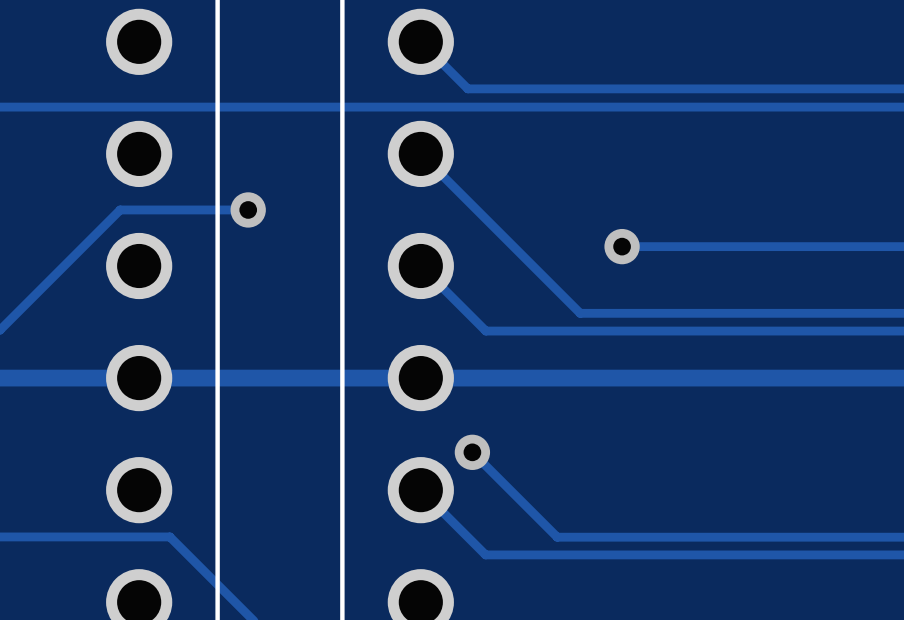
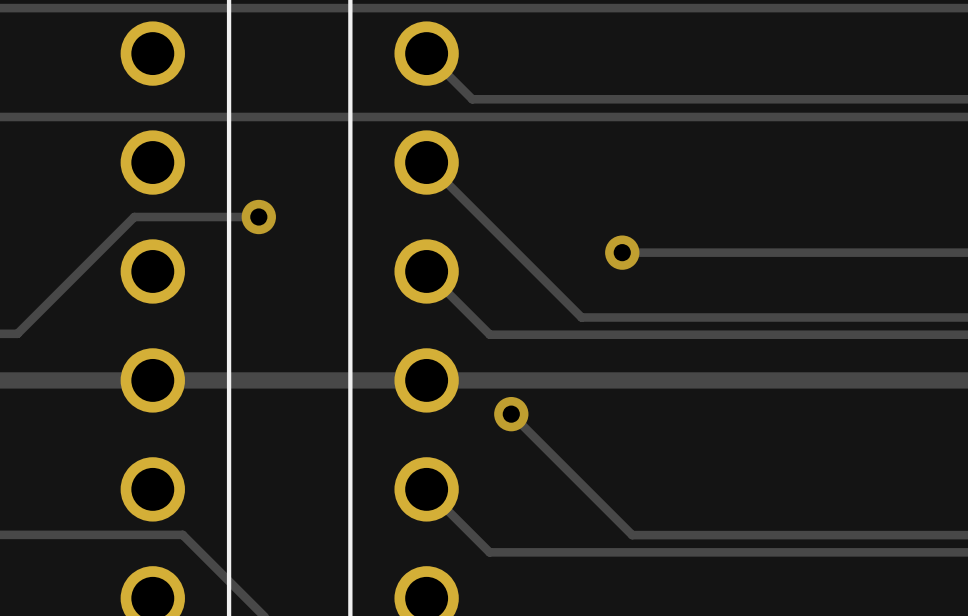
track: (472, 452) (557, 537) (632, 537) -> (511, 414) (632, 535)
via position: (472, 452) -> (511, 414)

